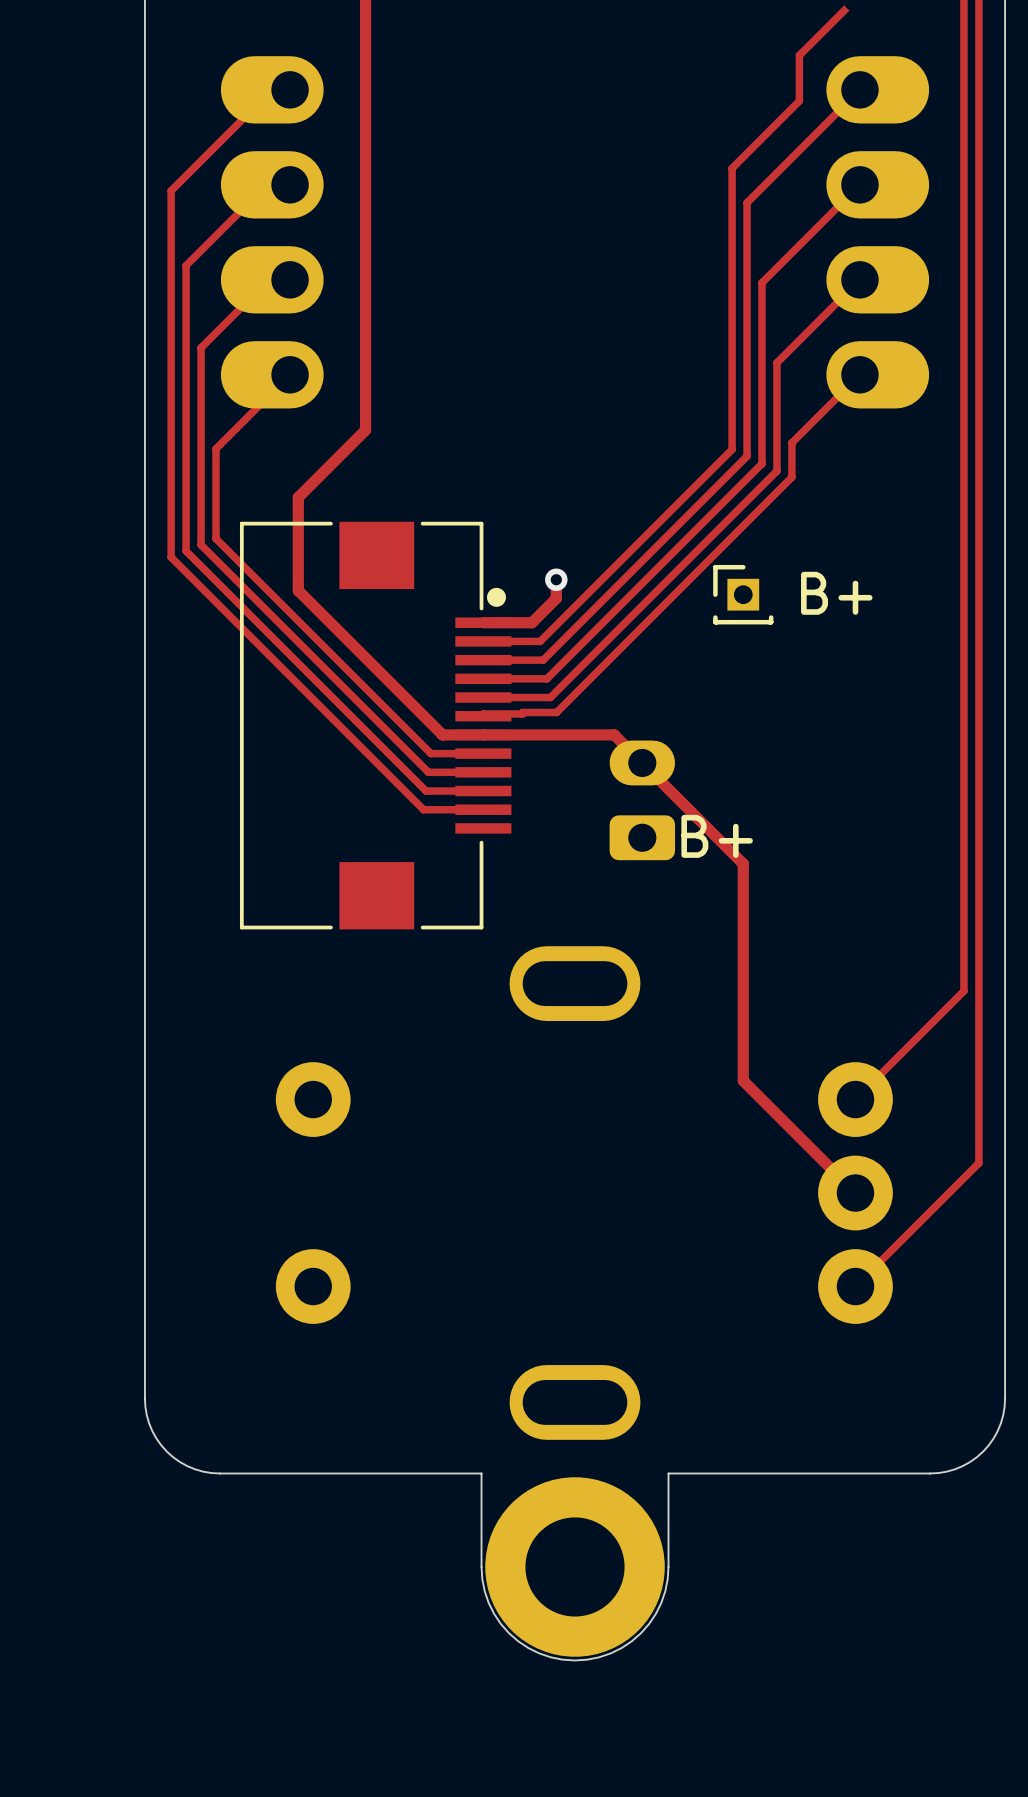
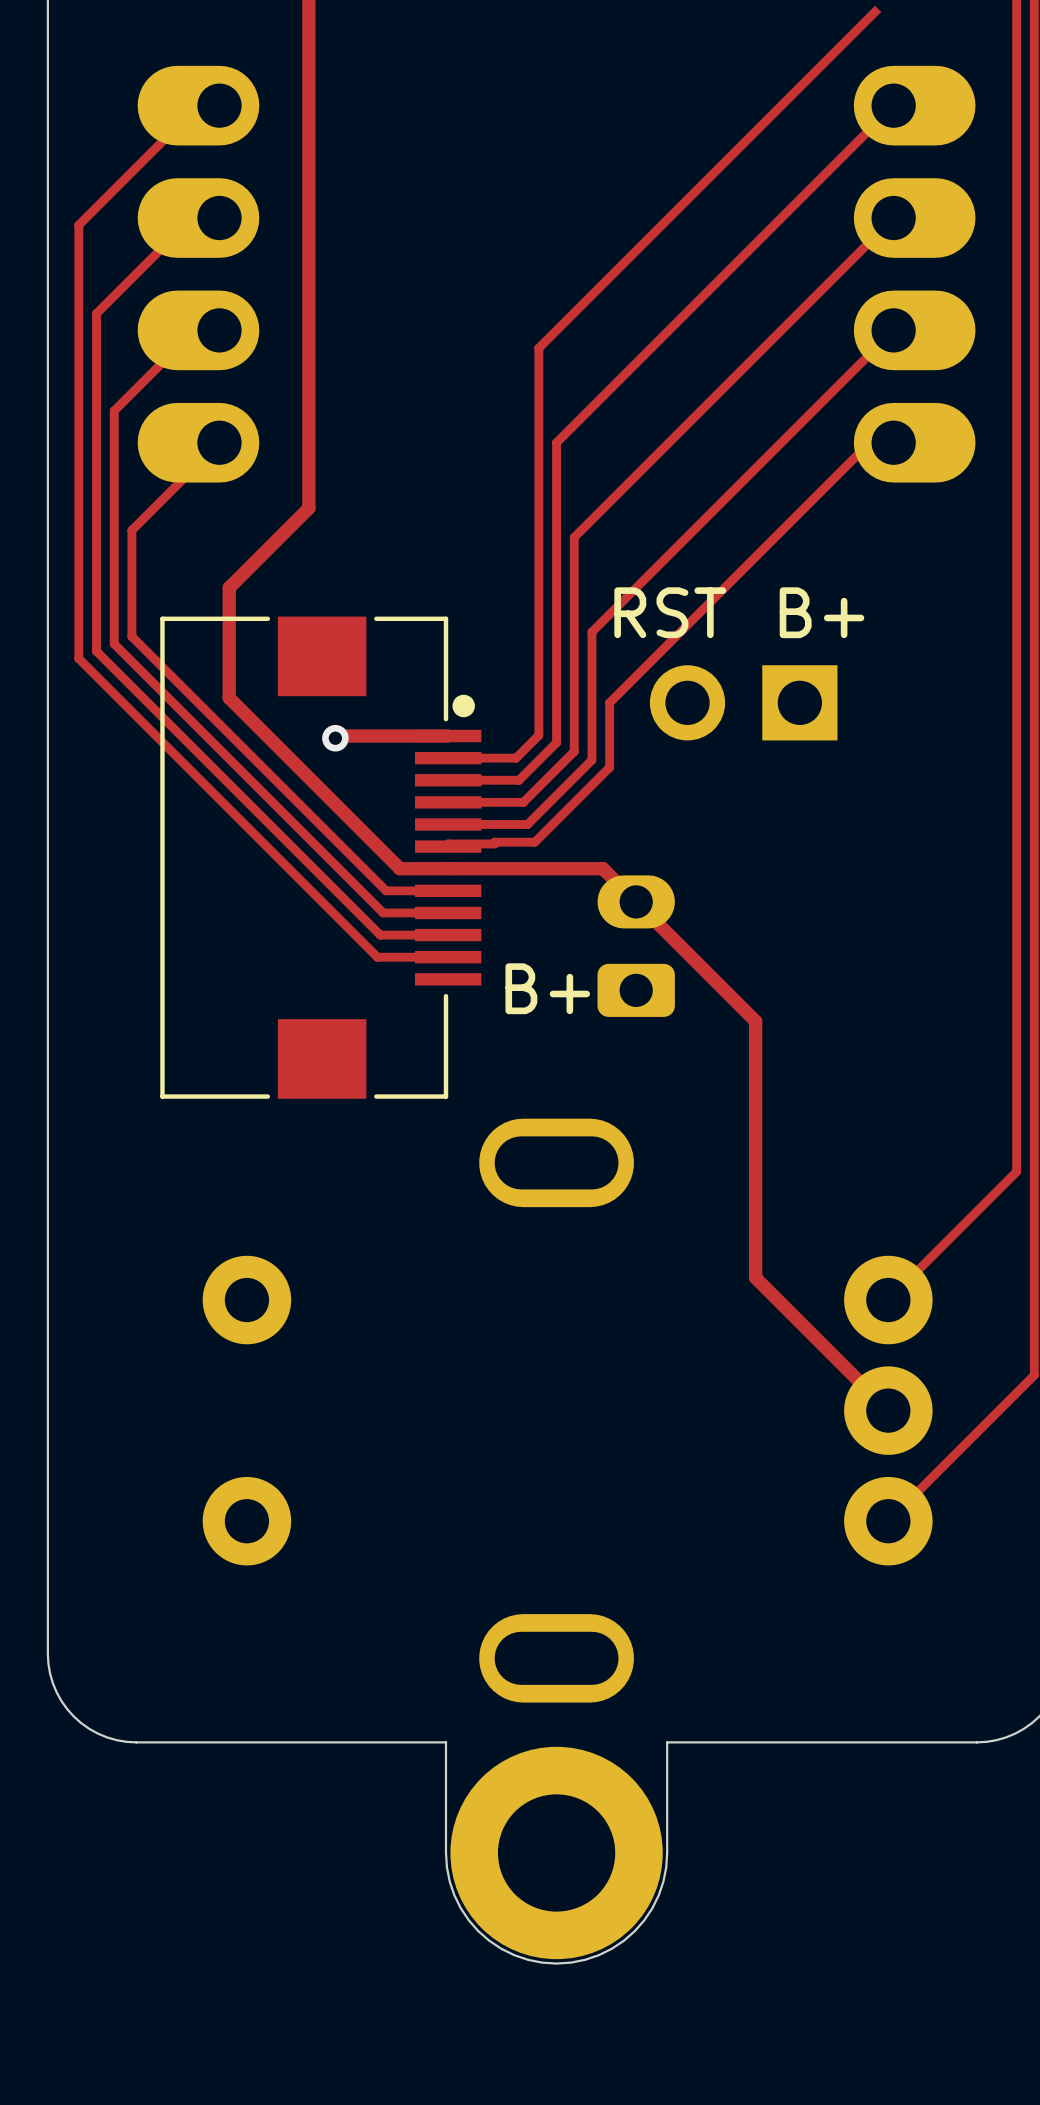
track: (799, 55) (799, 101) (732, 168) (732, 449) (540, 641) -> (821, 64) (538, 348) (538, 735) (516, 758)
track: (747, 202) (747, 456) (575, 628) -> (760, 239) (556, 442) (556, 742)
track: (761, 282) (761, 463) (589, 635) -> (777, 333) (574, 537) (574, 751)
track: (776, 362) (776, 471) (604, 643) -> (795, 428) (591, 632) (591, 760)
track: (859, 374) (791, 442) (791, 477) (619, 649) -> (893, 442) (869, 442) (609, 702) (609, 767)
part footprint: [713, 564, 774, 625] -> [649, 665, 838, 741]
track: (556, 579) (556, 598) (532, 622) (483, 622) -> (335, 738) (337, 736) (448, 736)
via position: (556, 579) -> (335, 738)
part value: B+ (836, 593) -> none
part text position: B+ (717, 836) -> B+ (547, 988)

